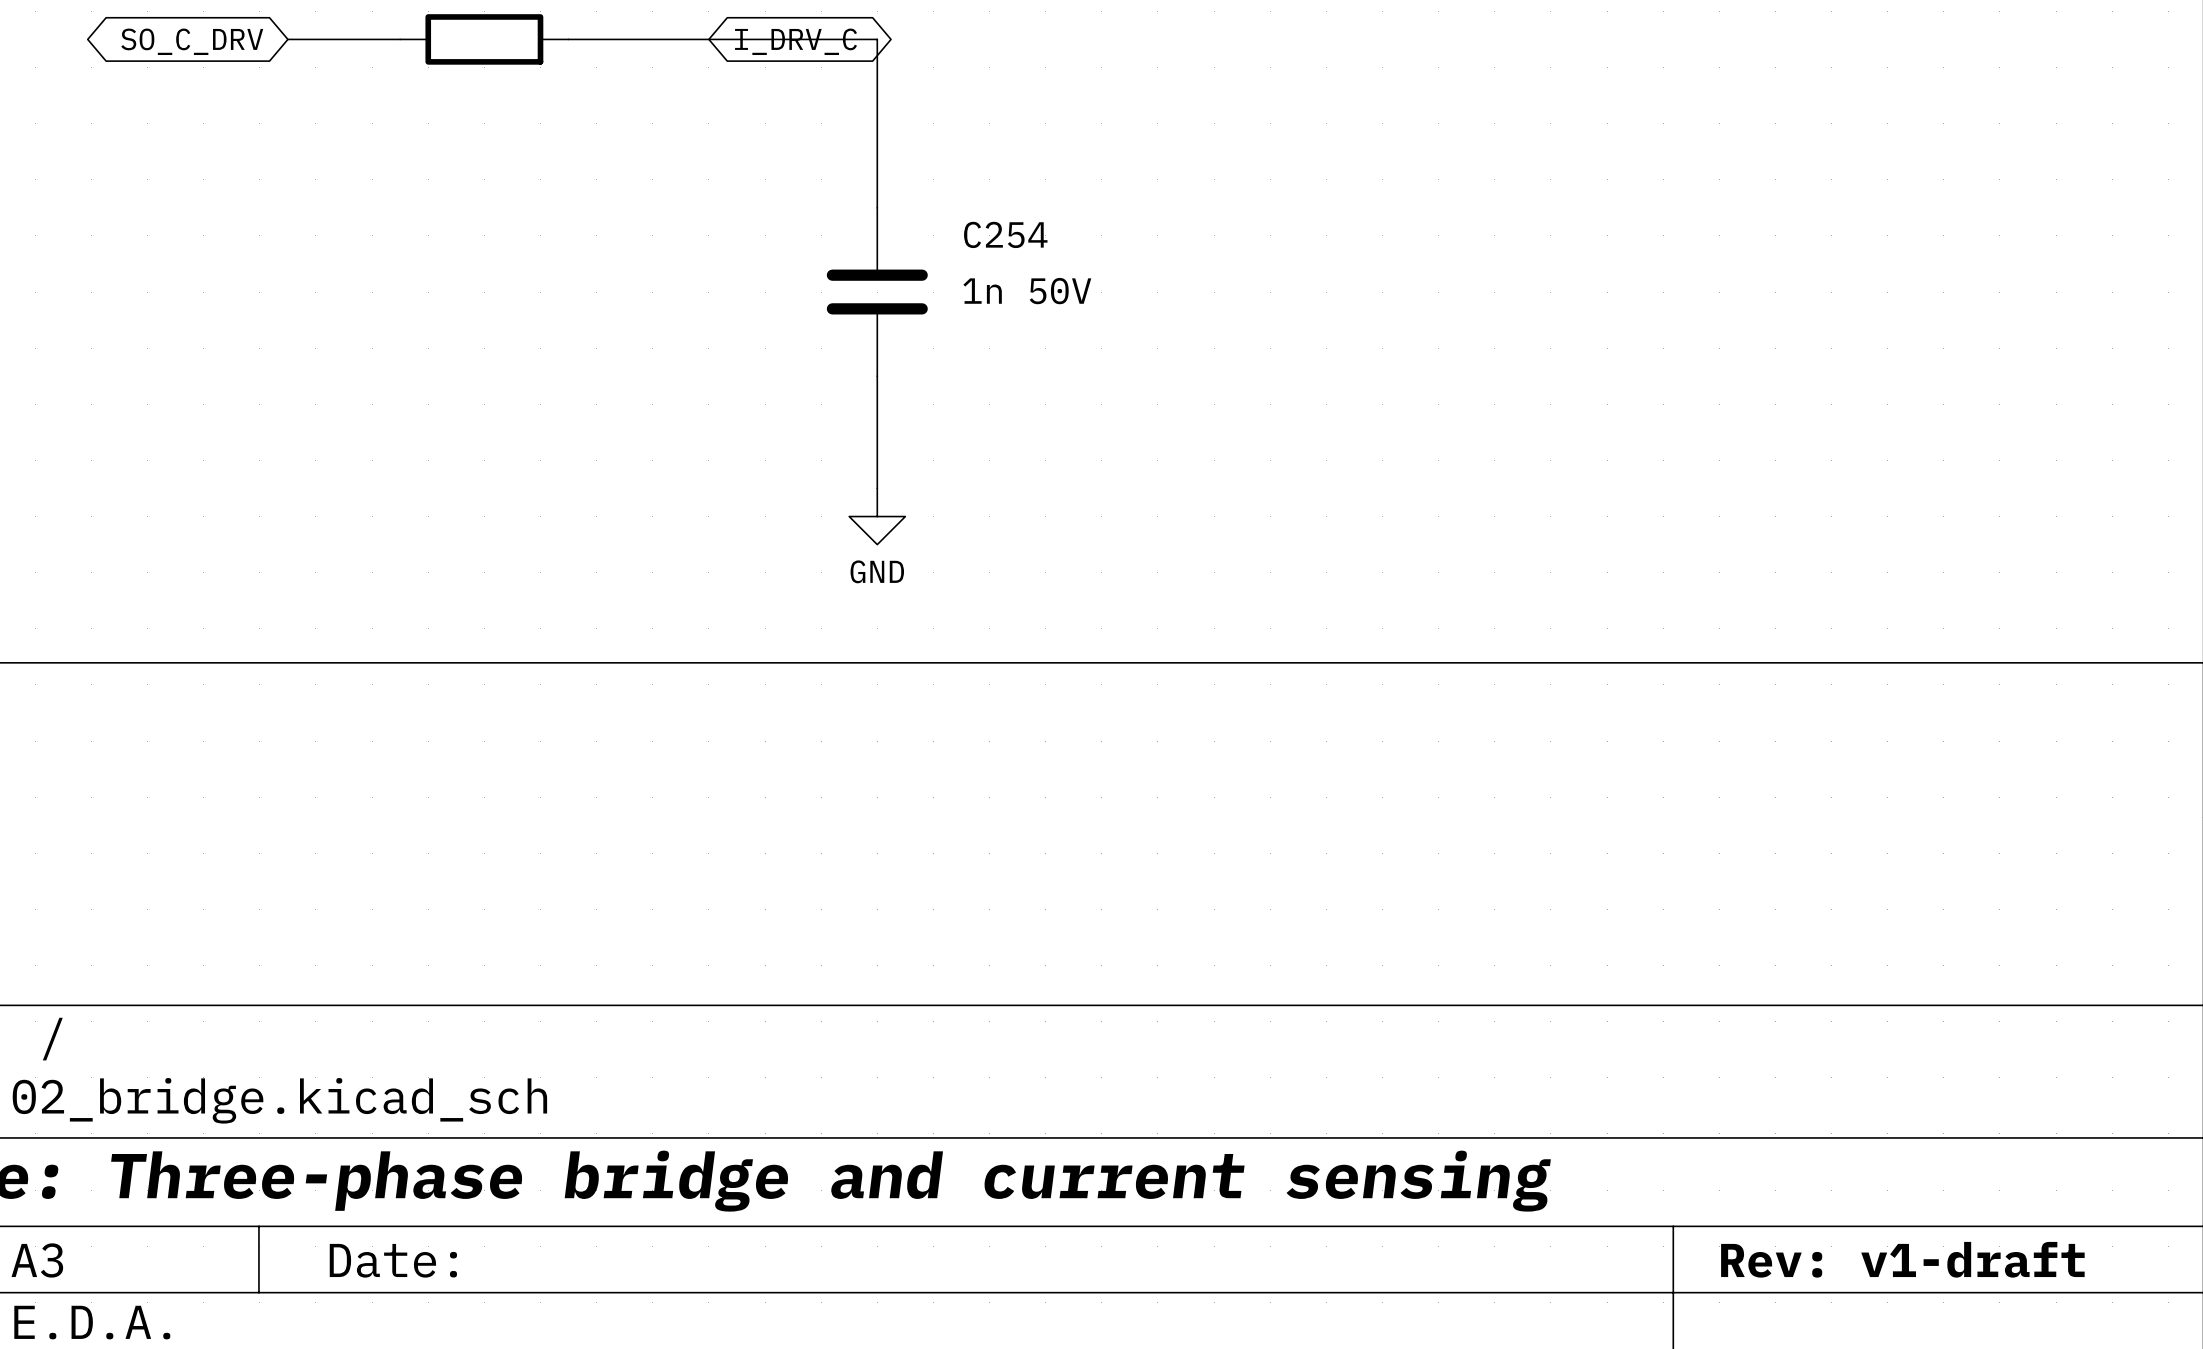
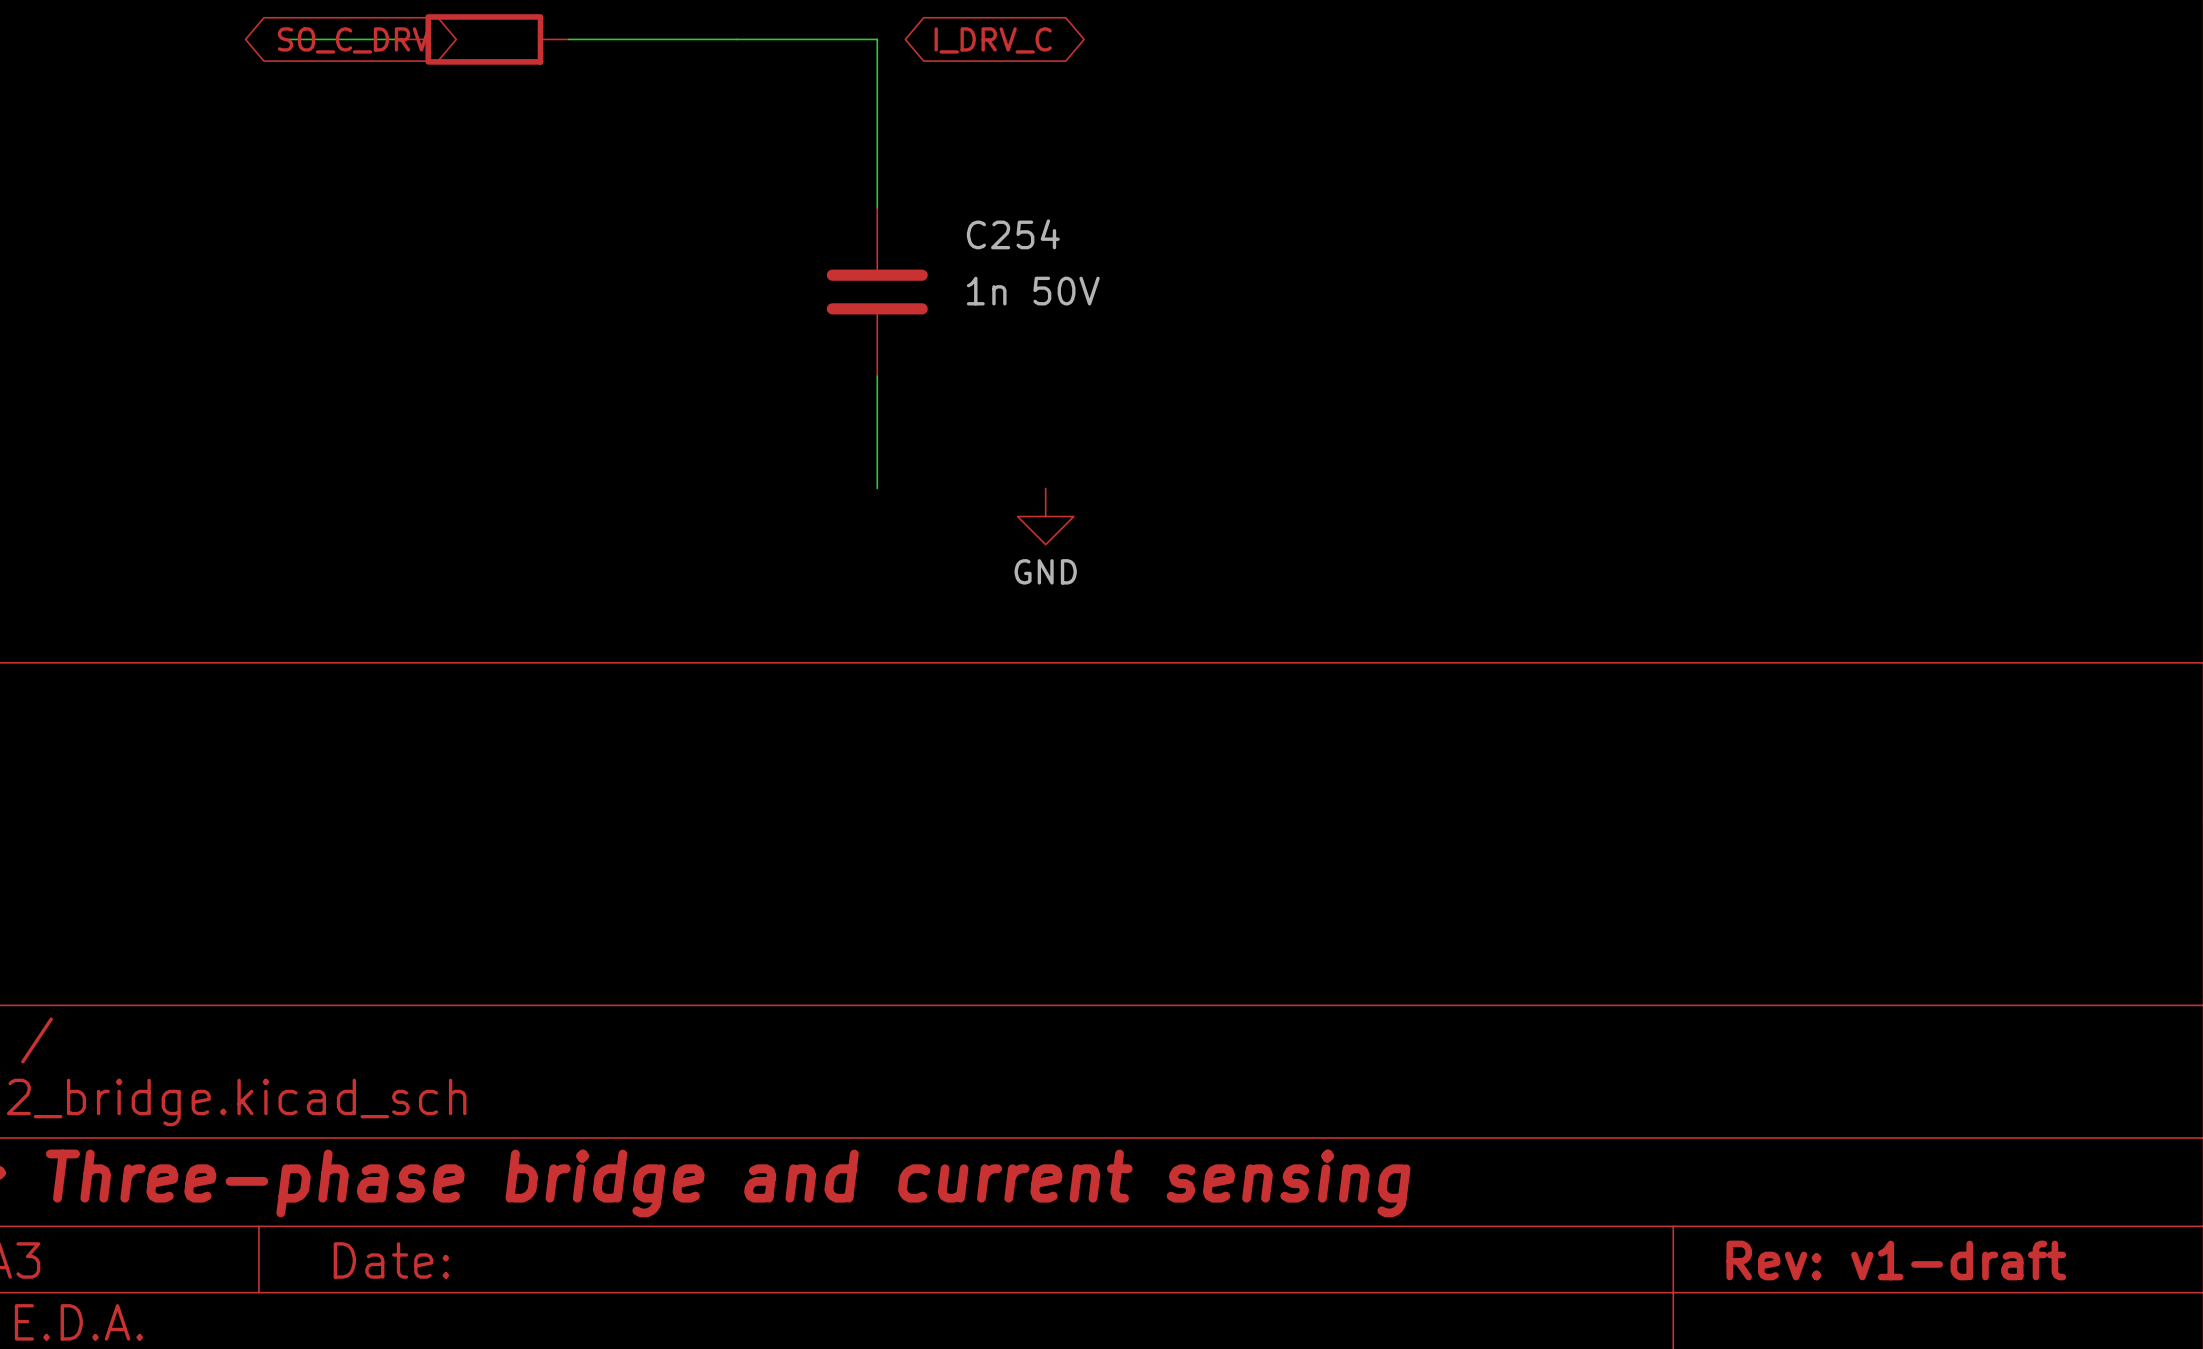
global label position: SO_C_DRV (192, 41) -> SO_C_DRV (354, 40)
global label position: I_DRV_C (796, 41) -> I_DRV_C (993, 40)
power symbol position: GND (877, 516) -> GND (1045, 516)

